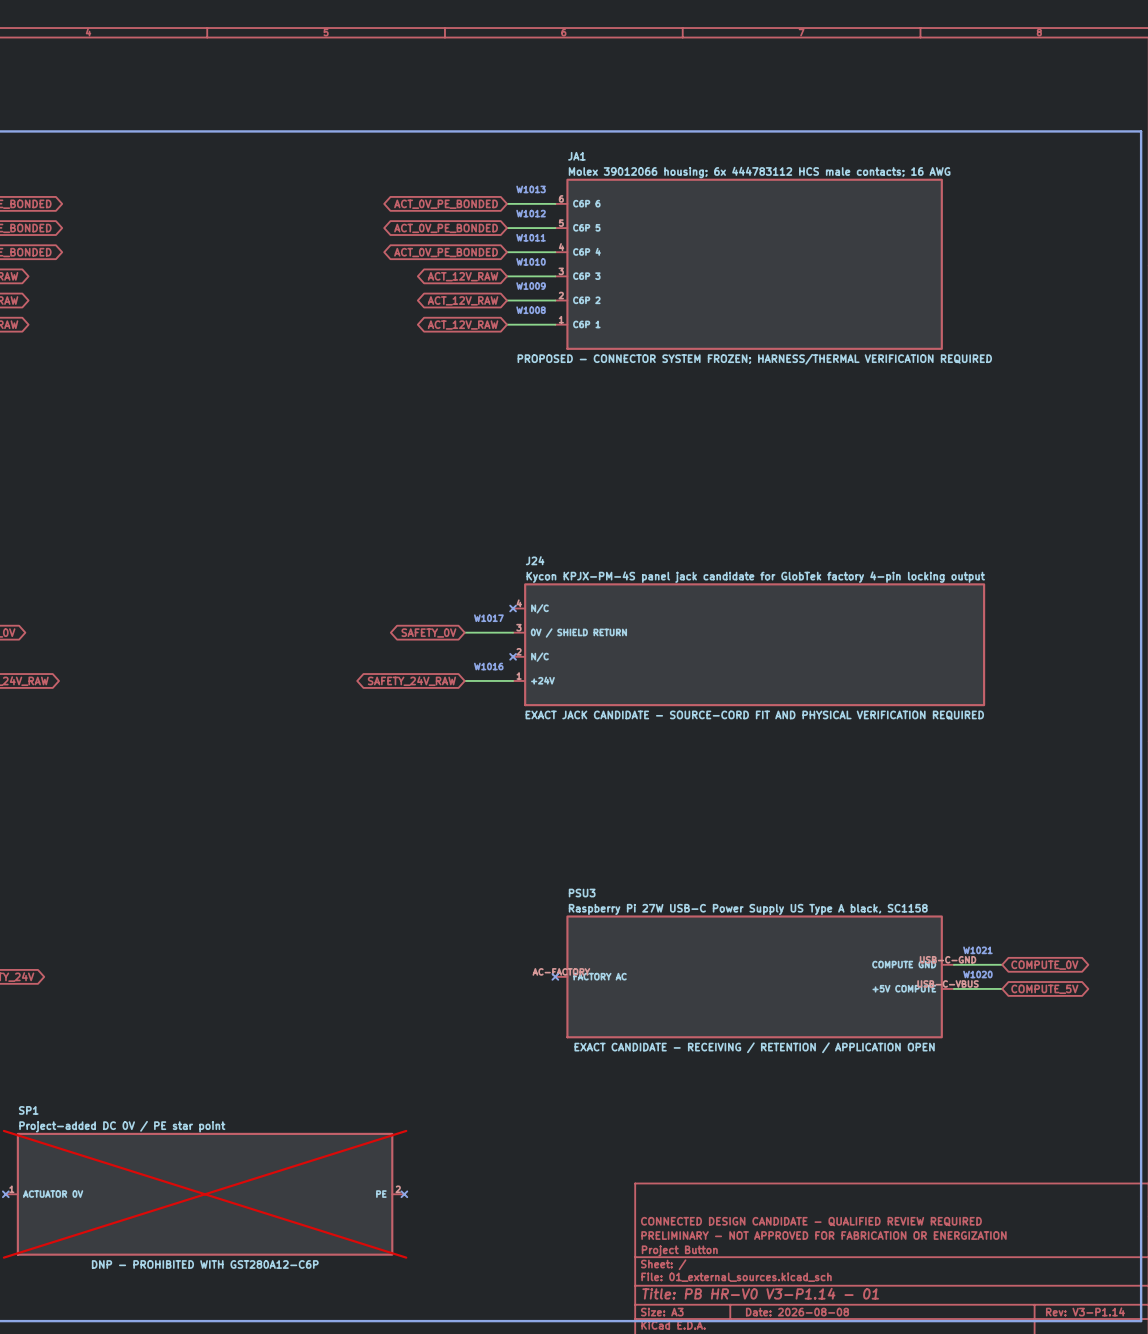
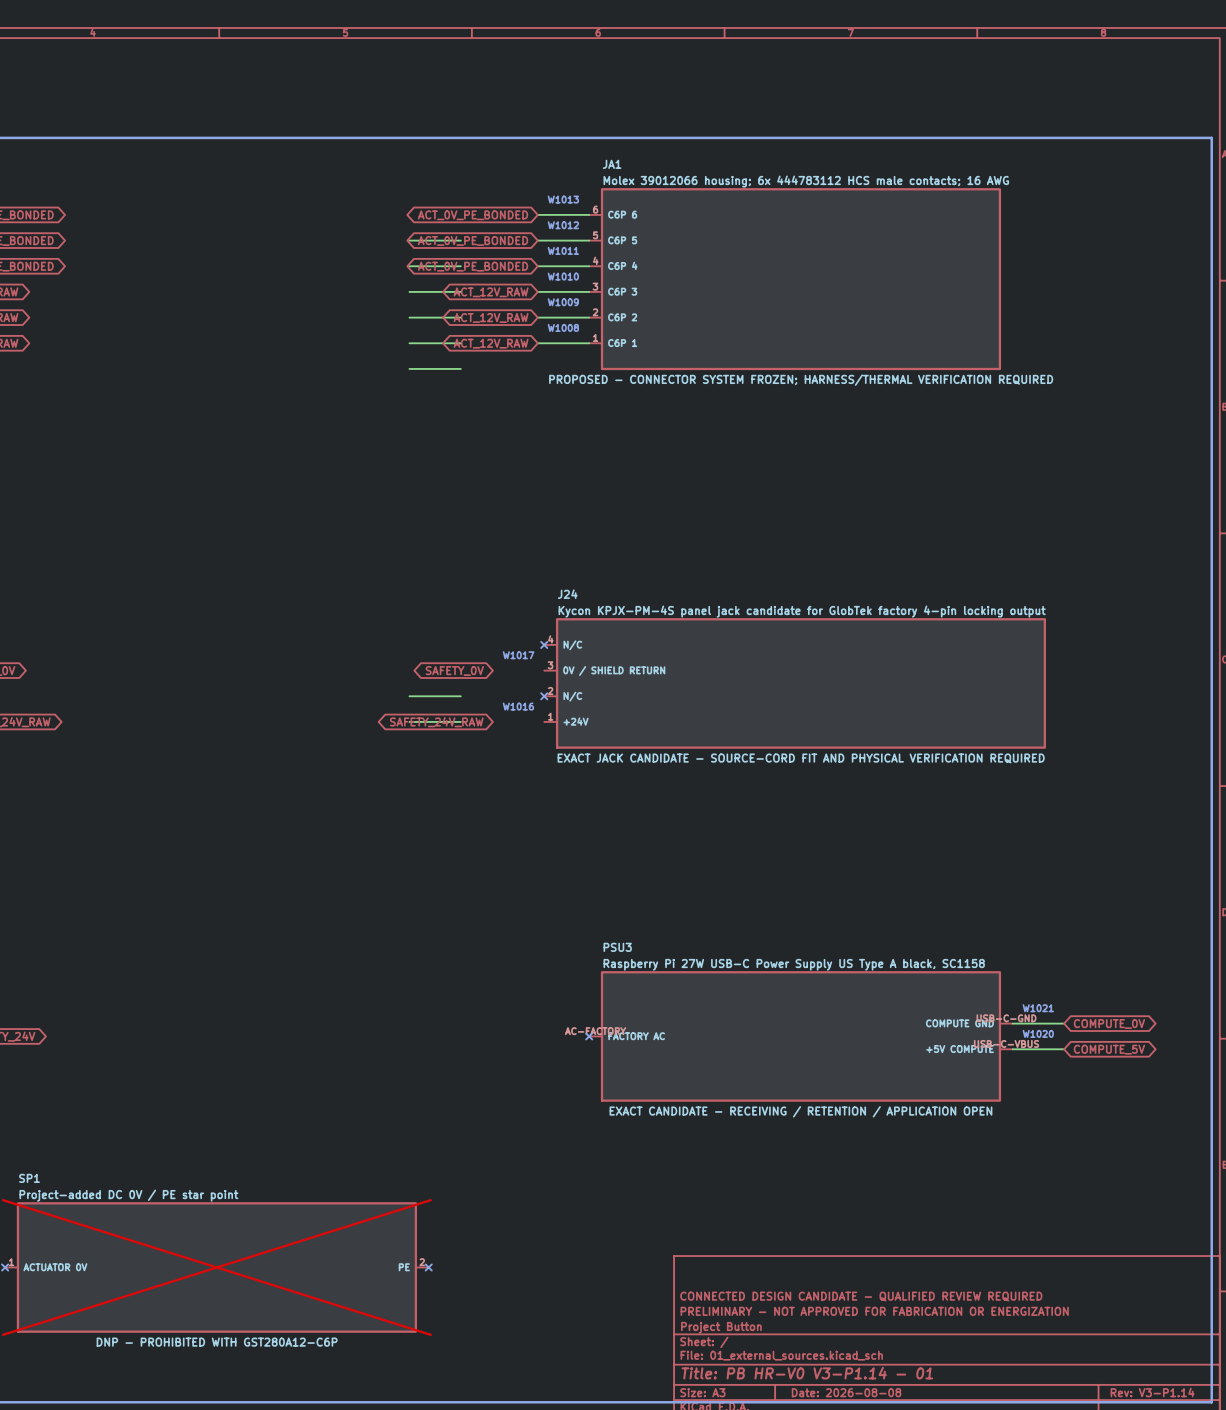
wire: none -> (409, 240) (460, 240)
wire: none -> (409, 266) (460, 266)
wire: none -> (409, 291) (460, 291)
wire: none -> (409, 317) (460, 317)
wire: none -> (409, 343) (460, 343)
wire: none -> (409, 368) (460, 368)
wire: (464, 632) (513, 632) -> (409, 696) (460, 696)
wire: (464, 680) (513, 680) -> (409, 721) (460, 721)

